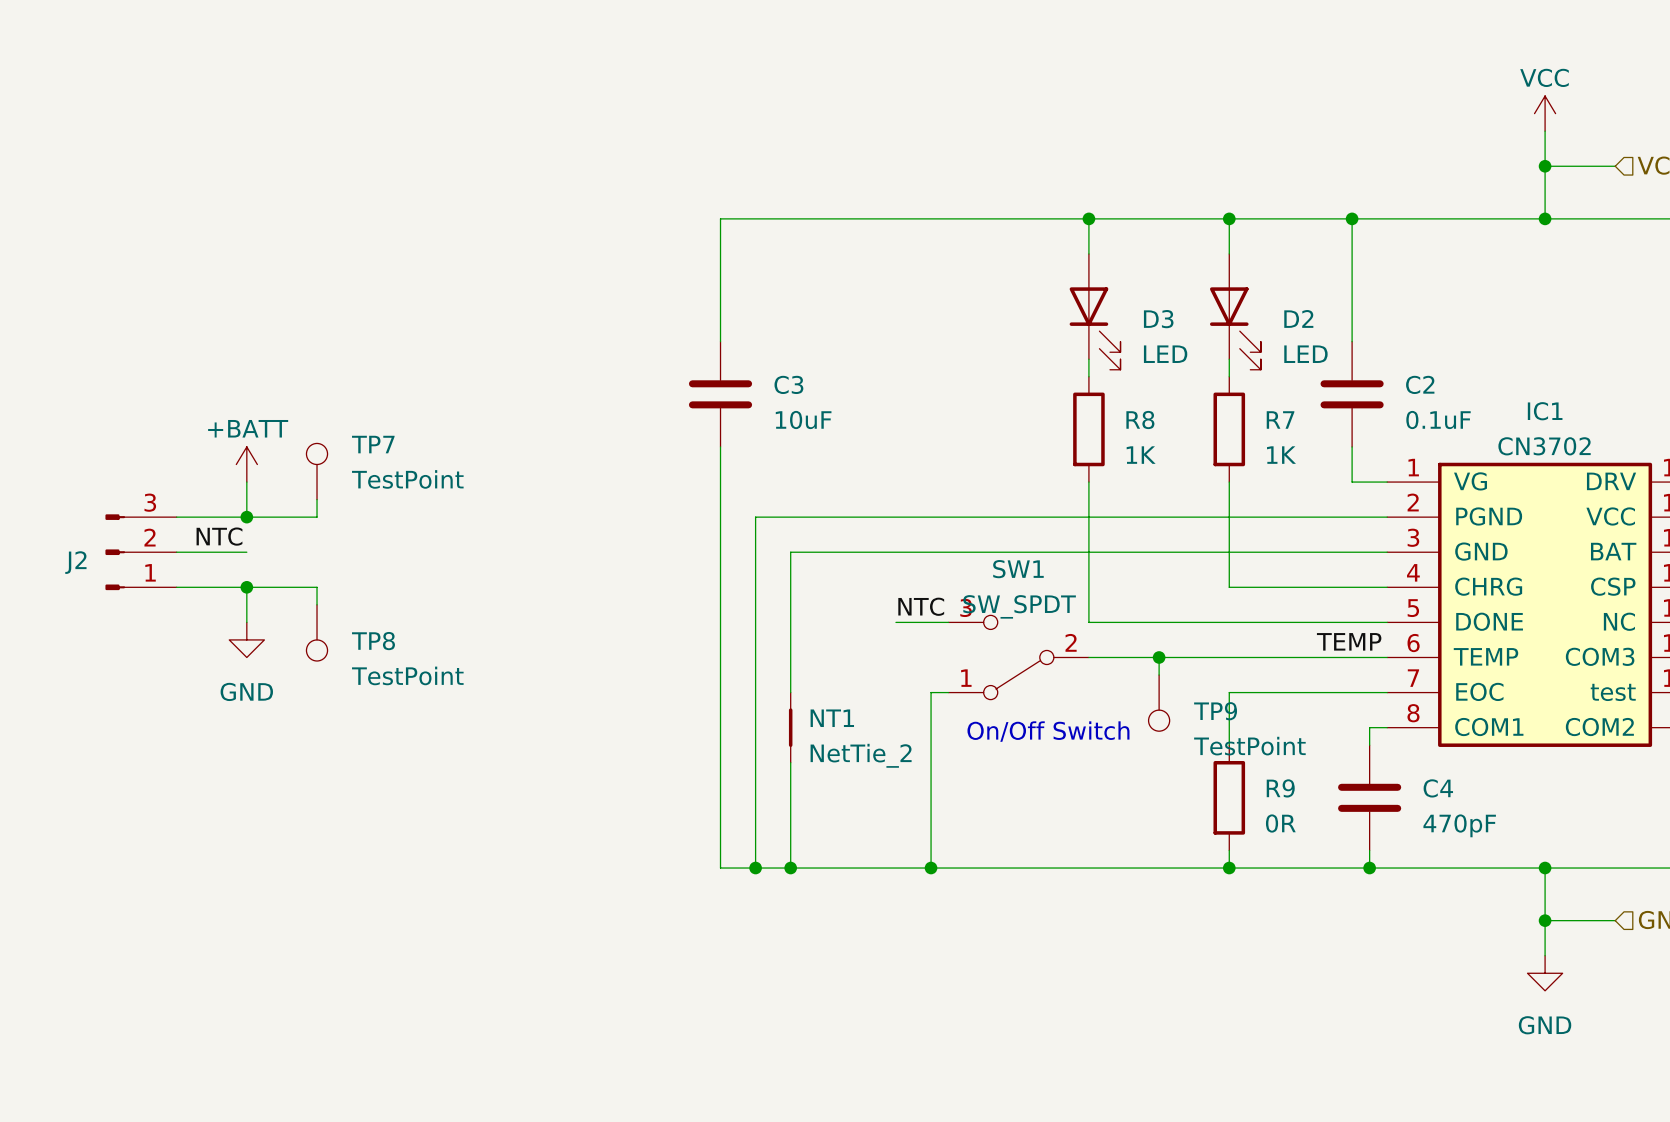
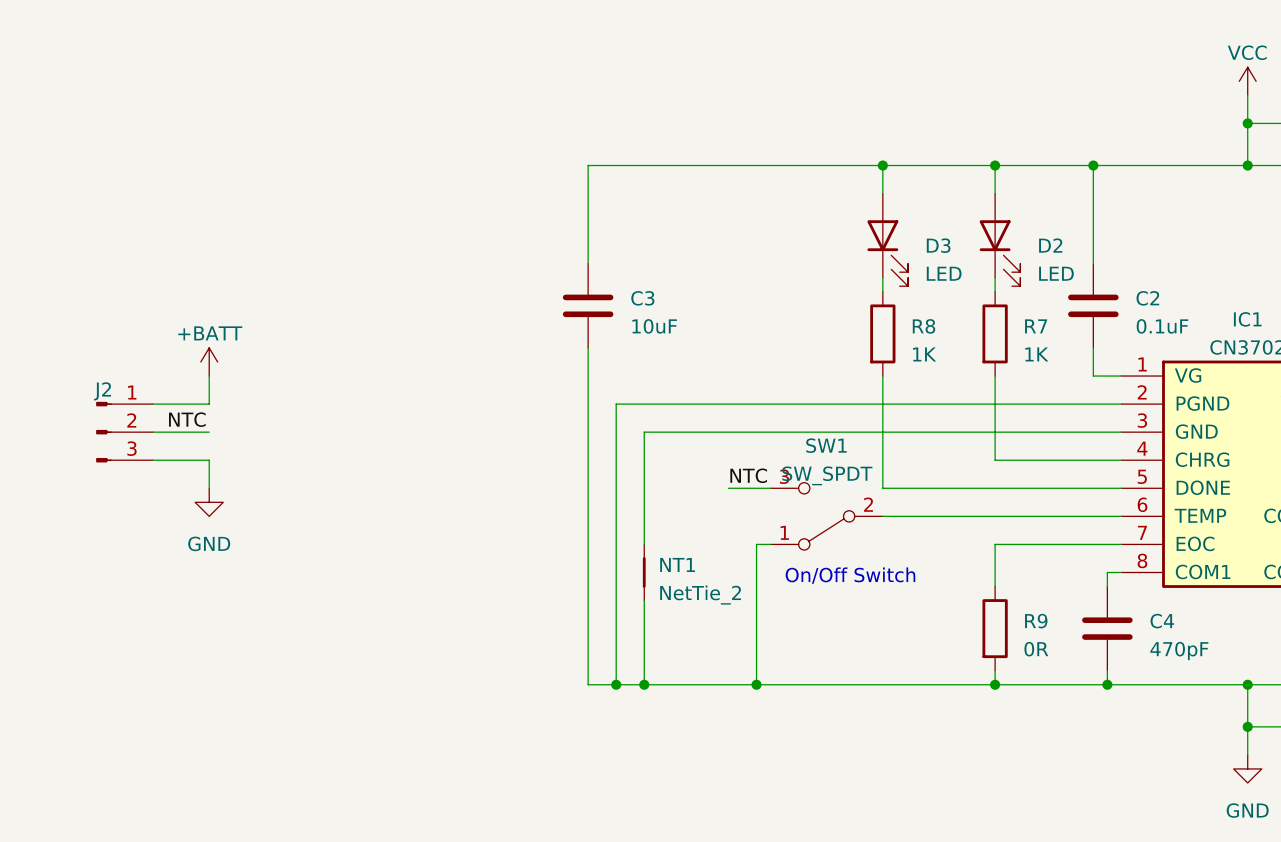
TP7: TestPoint (317, 471) -> none
wire: (317, 499) (317, 517) (246, 517) -> none
junction: (246, 517) -> none
J2 flip: as is (115, 552) -> up-down (103, 432)
J2 name position: J2 (75, 562) -> J2 (102, 391)
wire: (246, 587) (317, 587) (317, 604) -> none
junction: (246, 587) -> none
TP8: TestPoint (317, 632) -> none
label: TEMP (1349, 641) -> none
wire: (1159, 657) (1159, 675) -> none
junction: (1159, 657) -> none
TP9: TestPoint (1159, 703) -> none

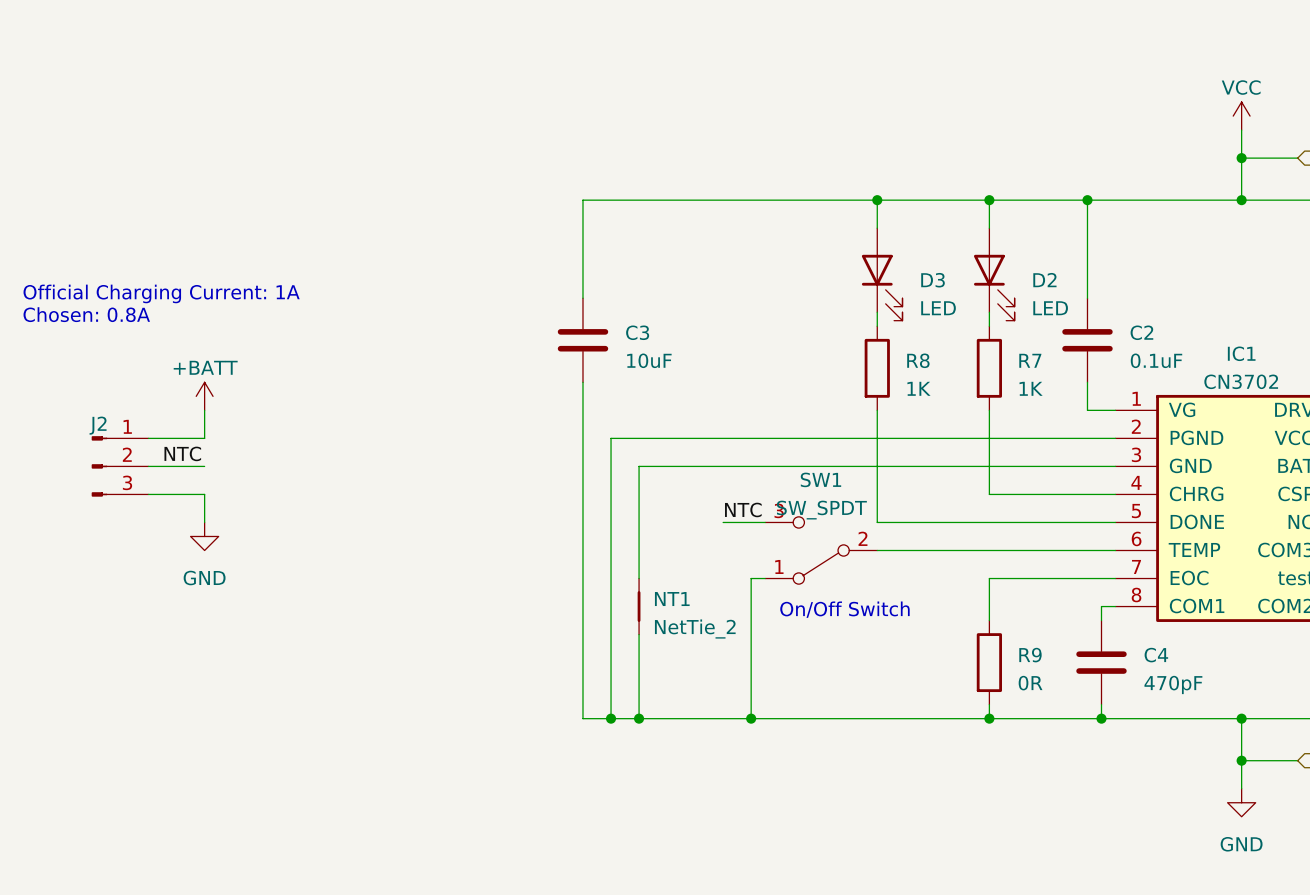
text: none -> Official Charging Current: 1A (161, 293)
text: none -> Chosen: 0.8A (86, 314)

